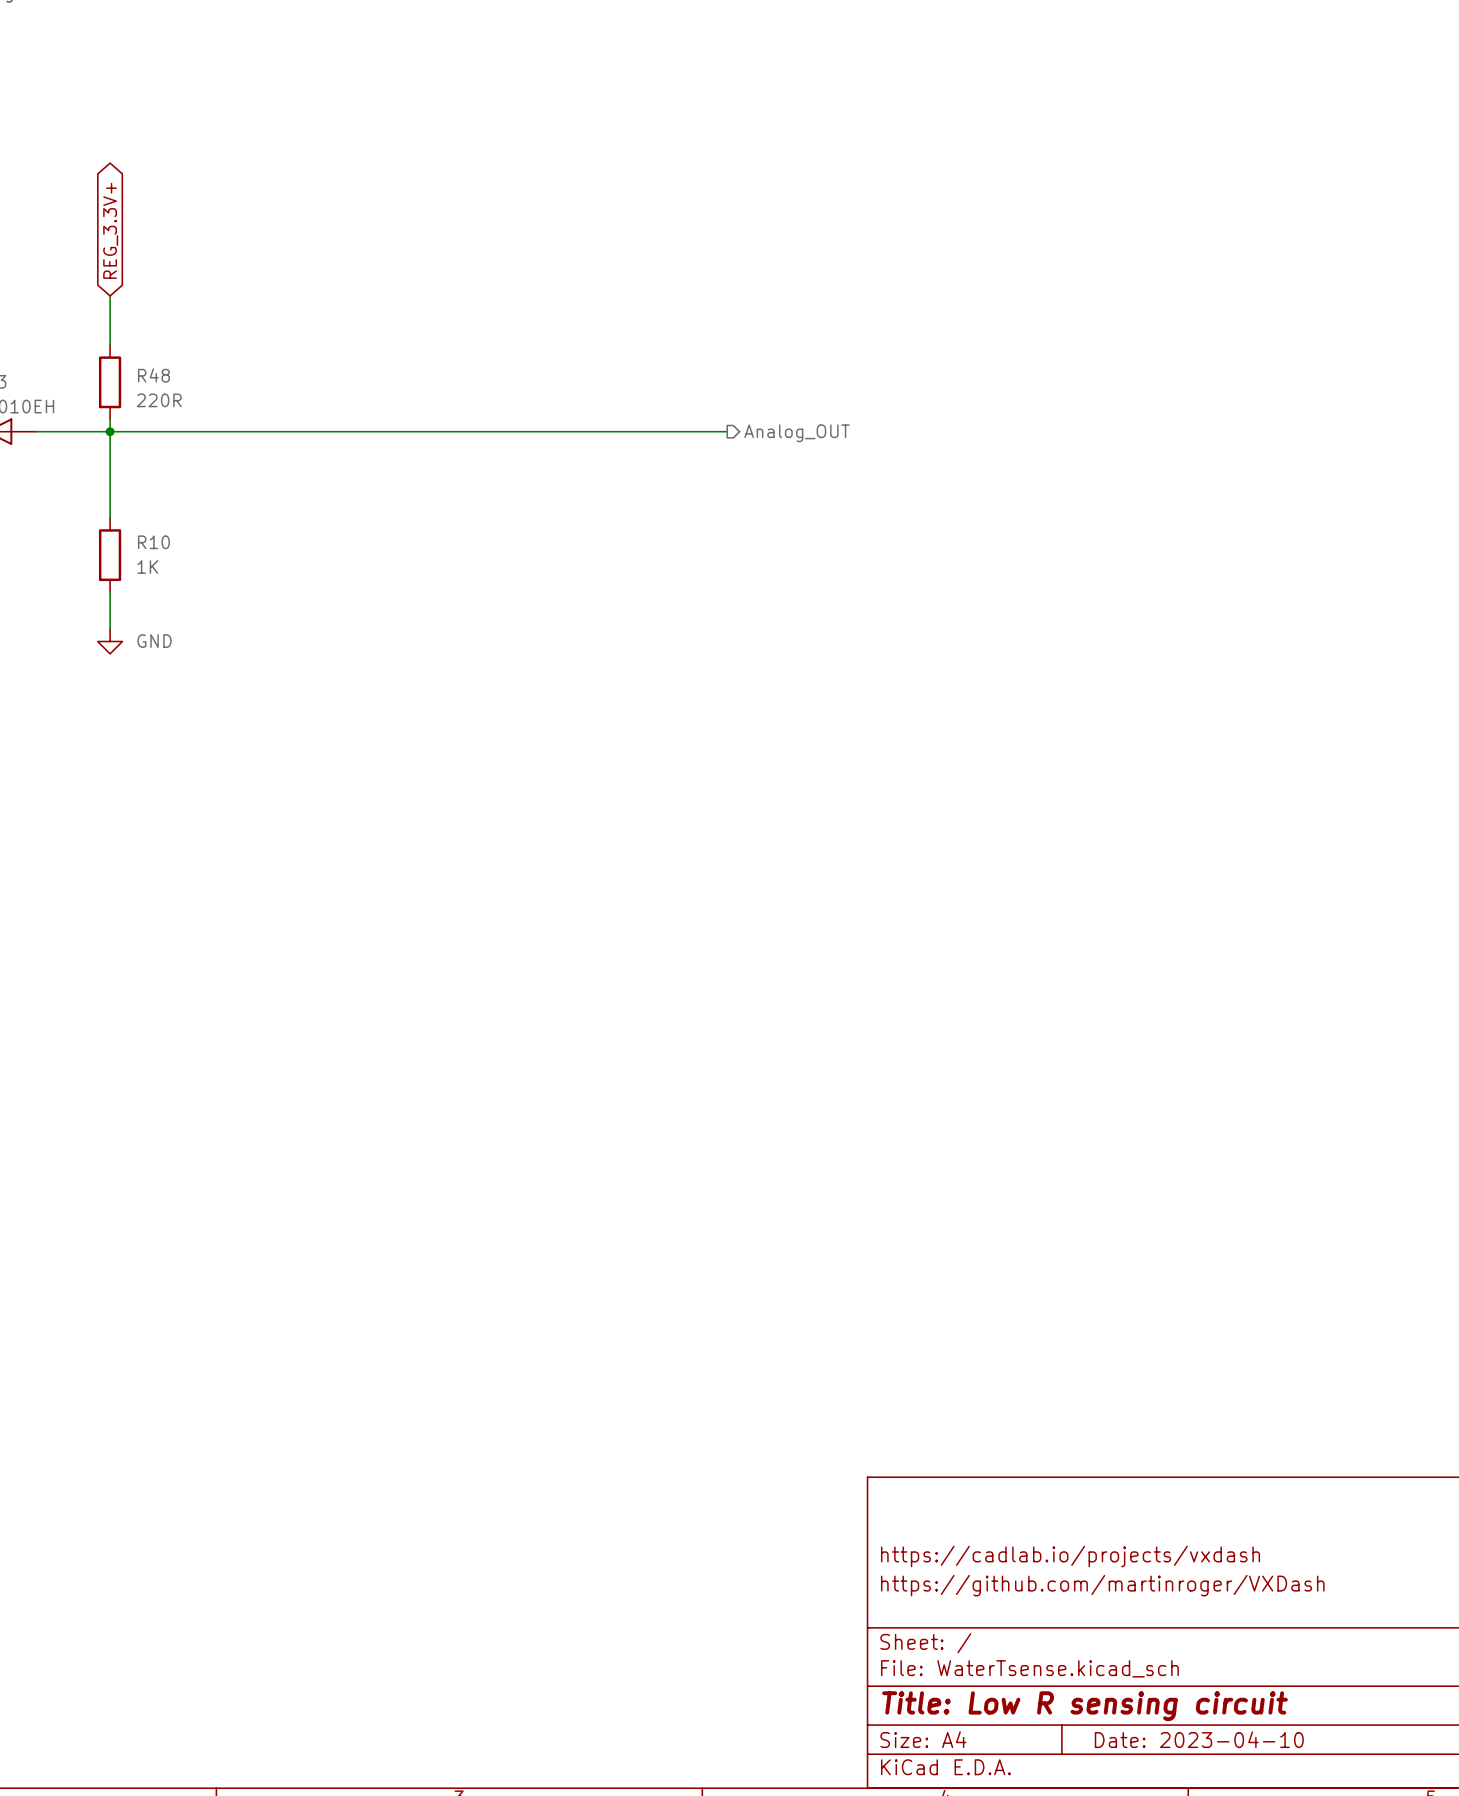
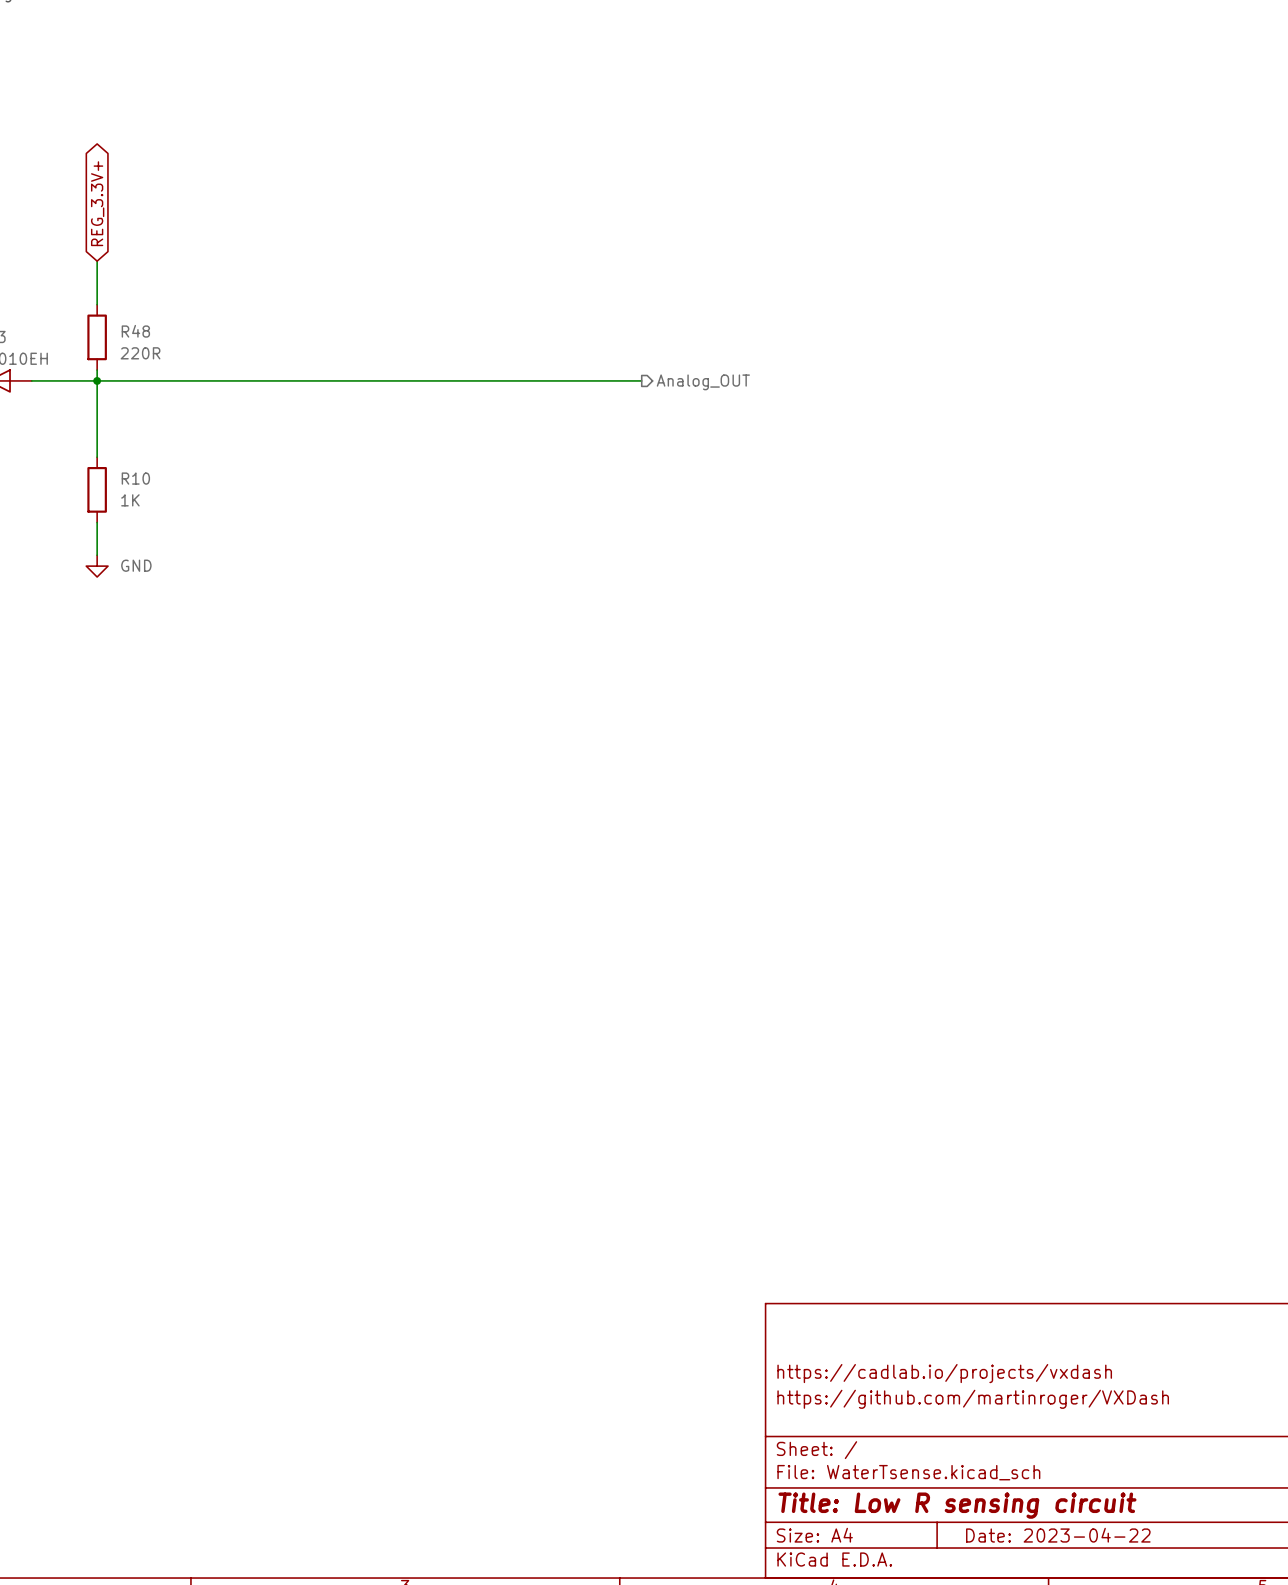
title block: Date: 2023-04-10 (1199, 1739) -> Date: 2023-04-22 (1058, 1535)

